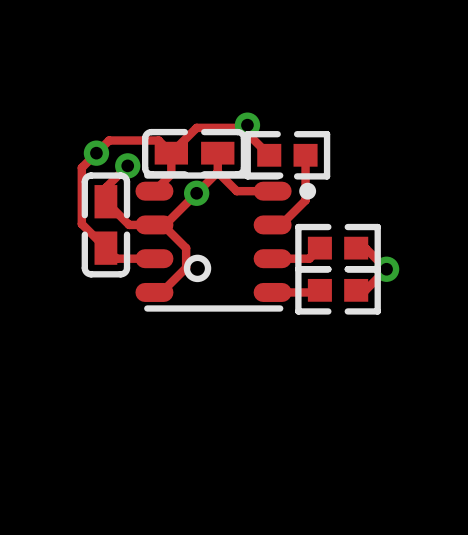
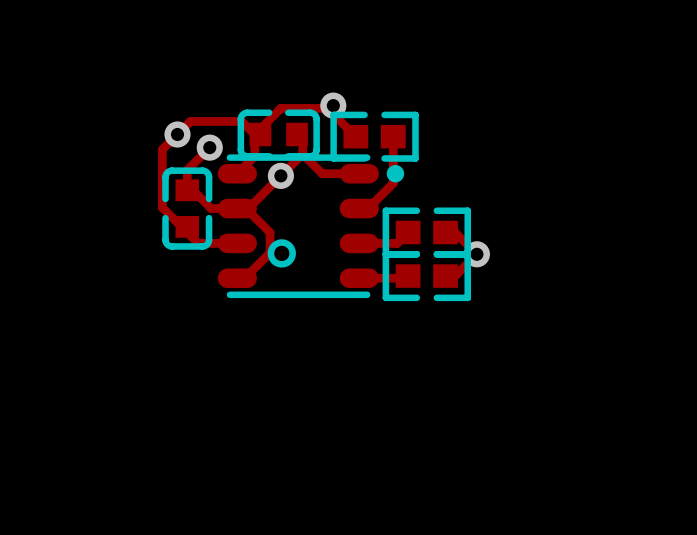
part footprint: [142, 128, 248, 178] -> [237, 109, 320, 160]
part footprint: [81, 172, 131, 278] -> [162, 167, 213, 250]

